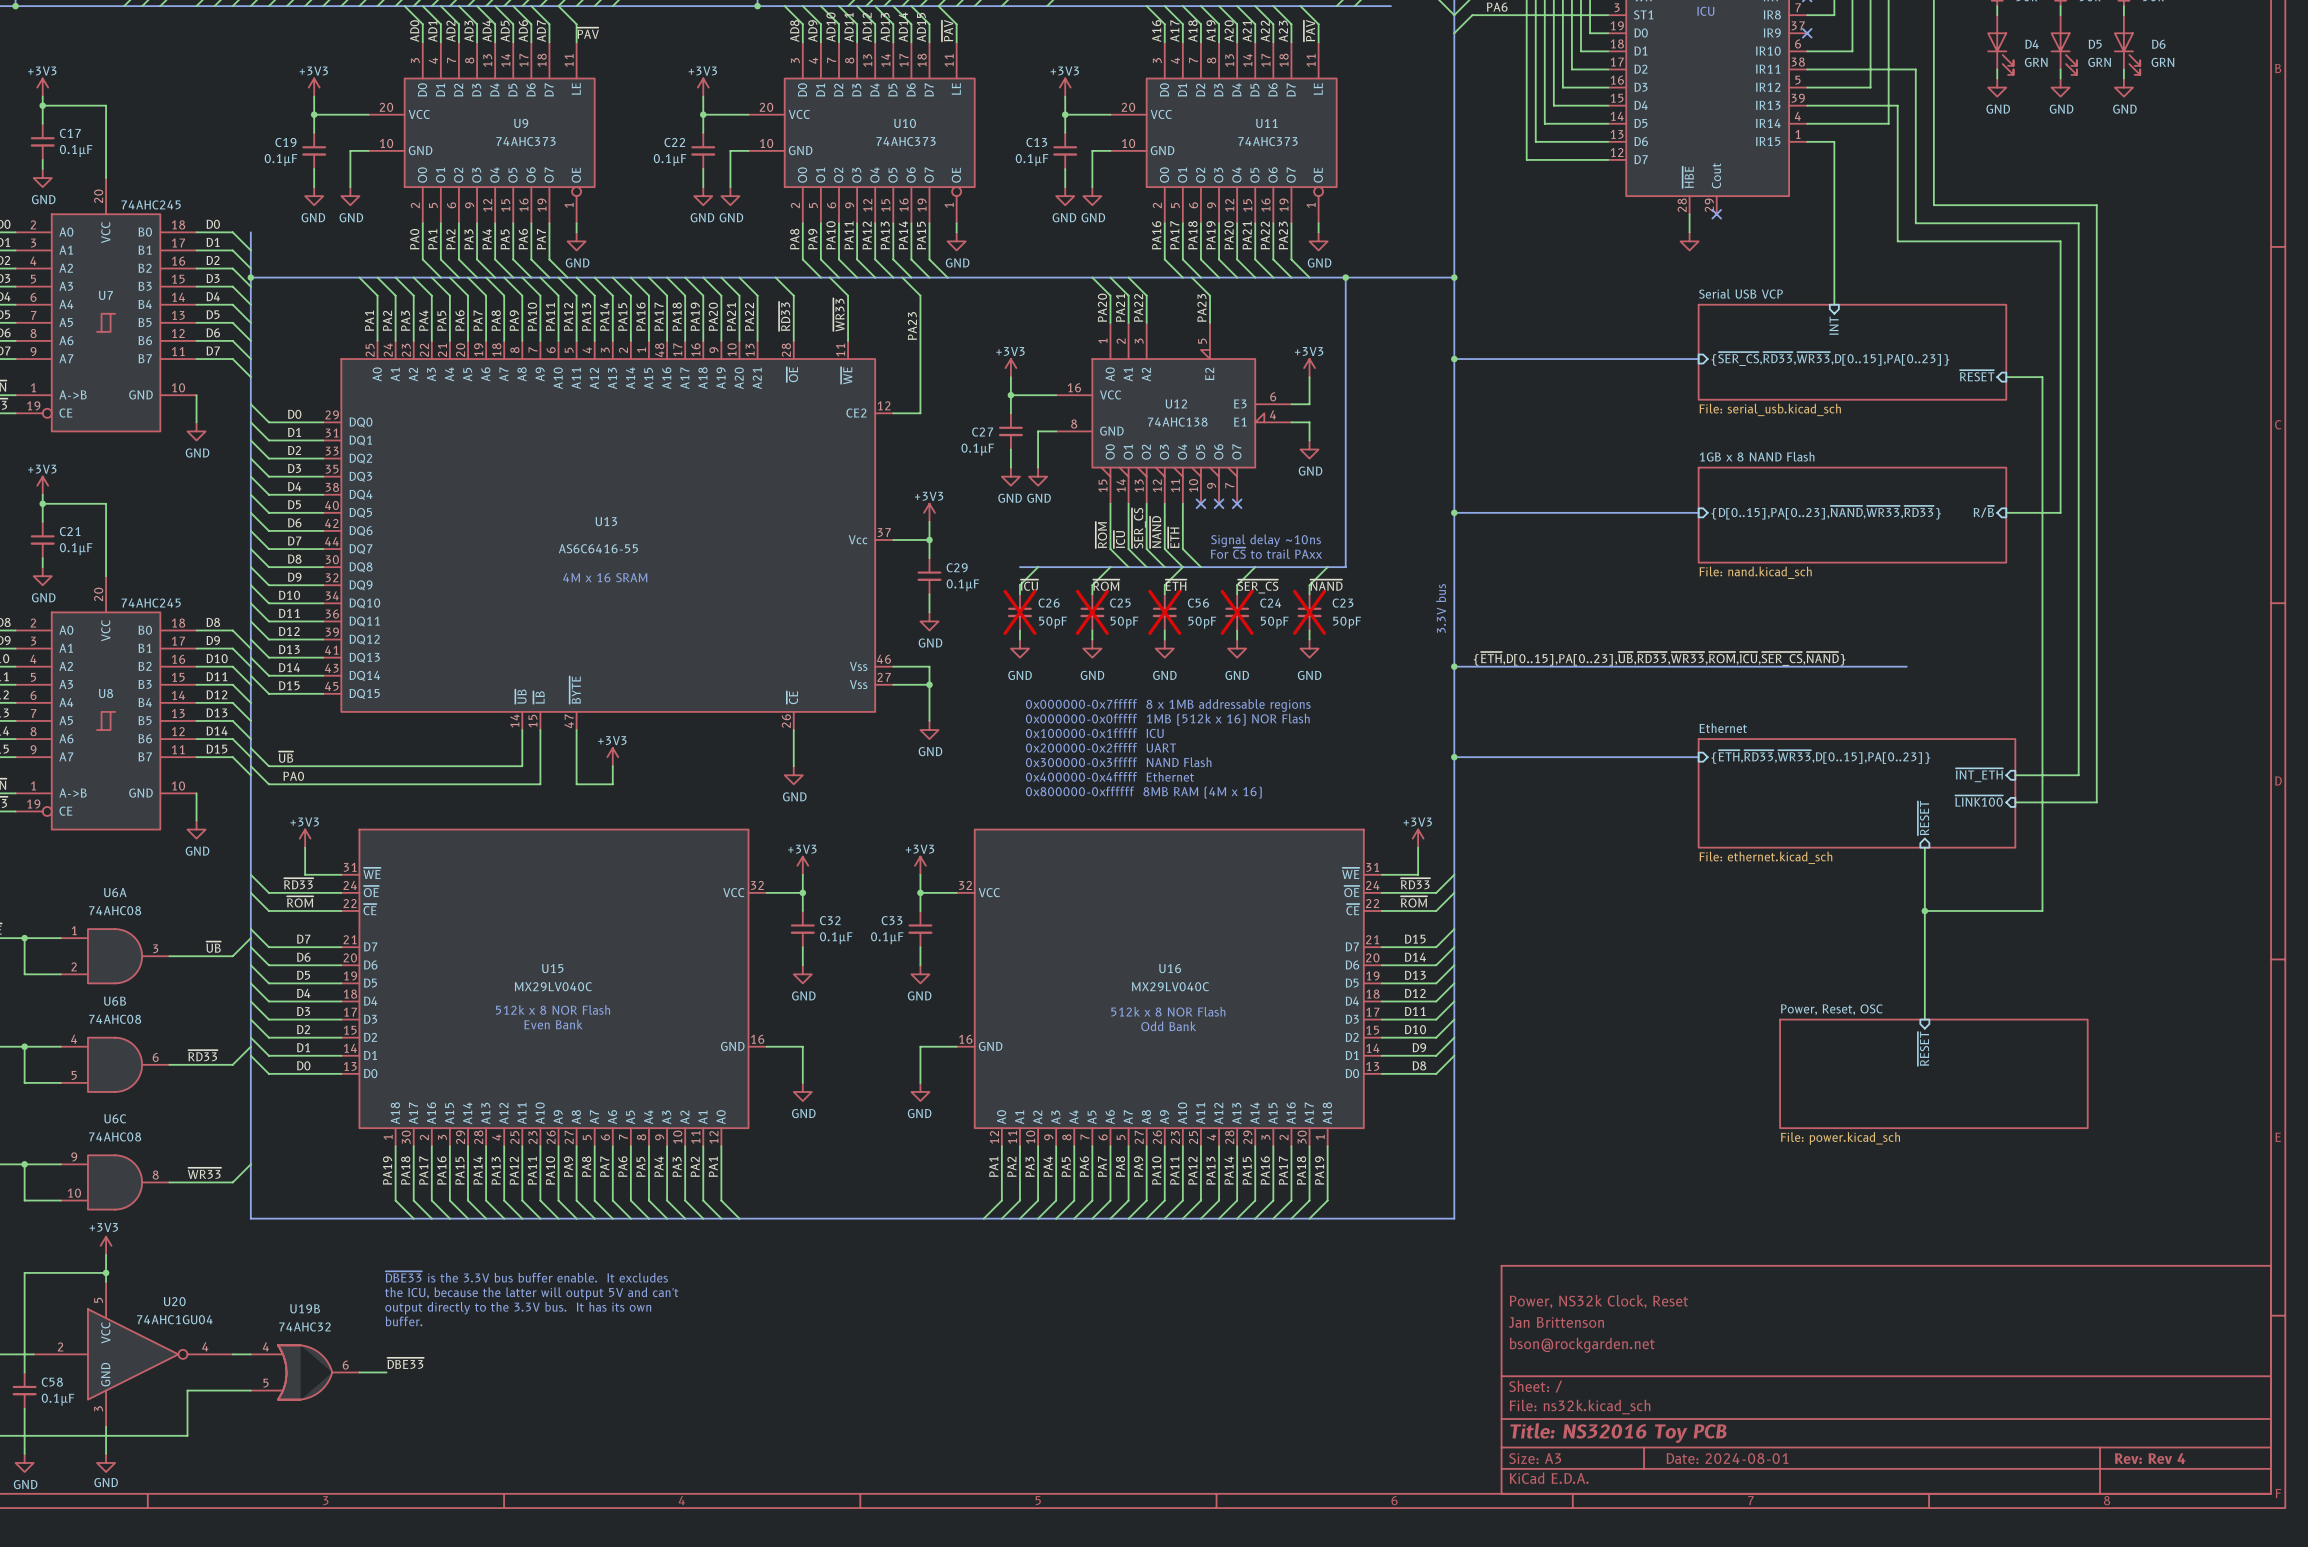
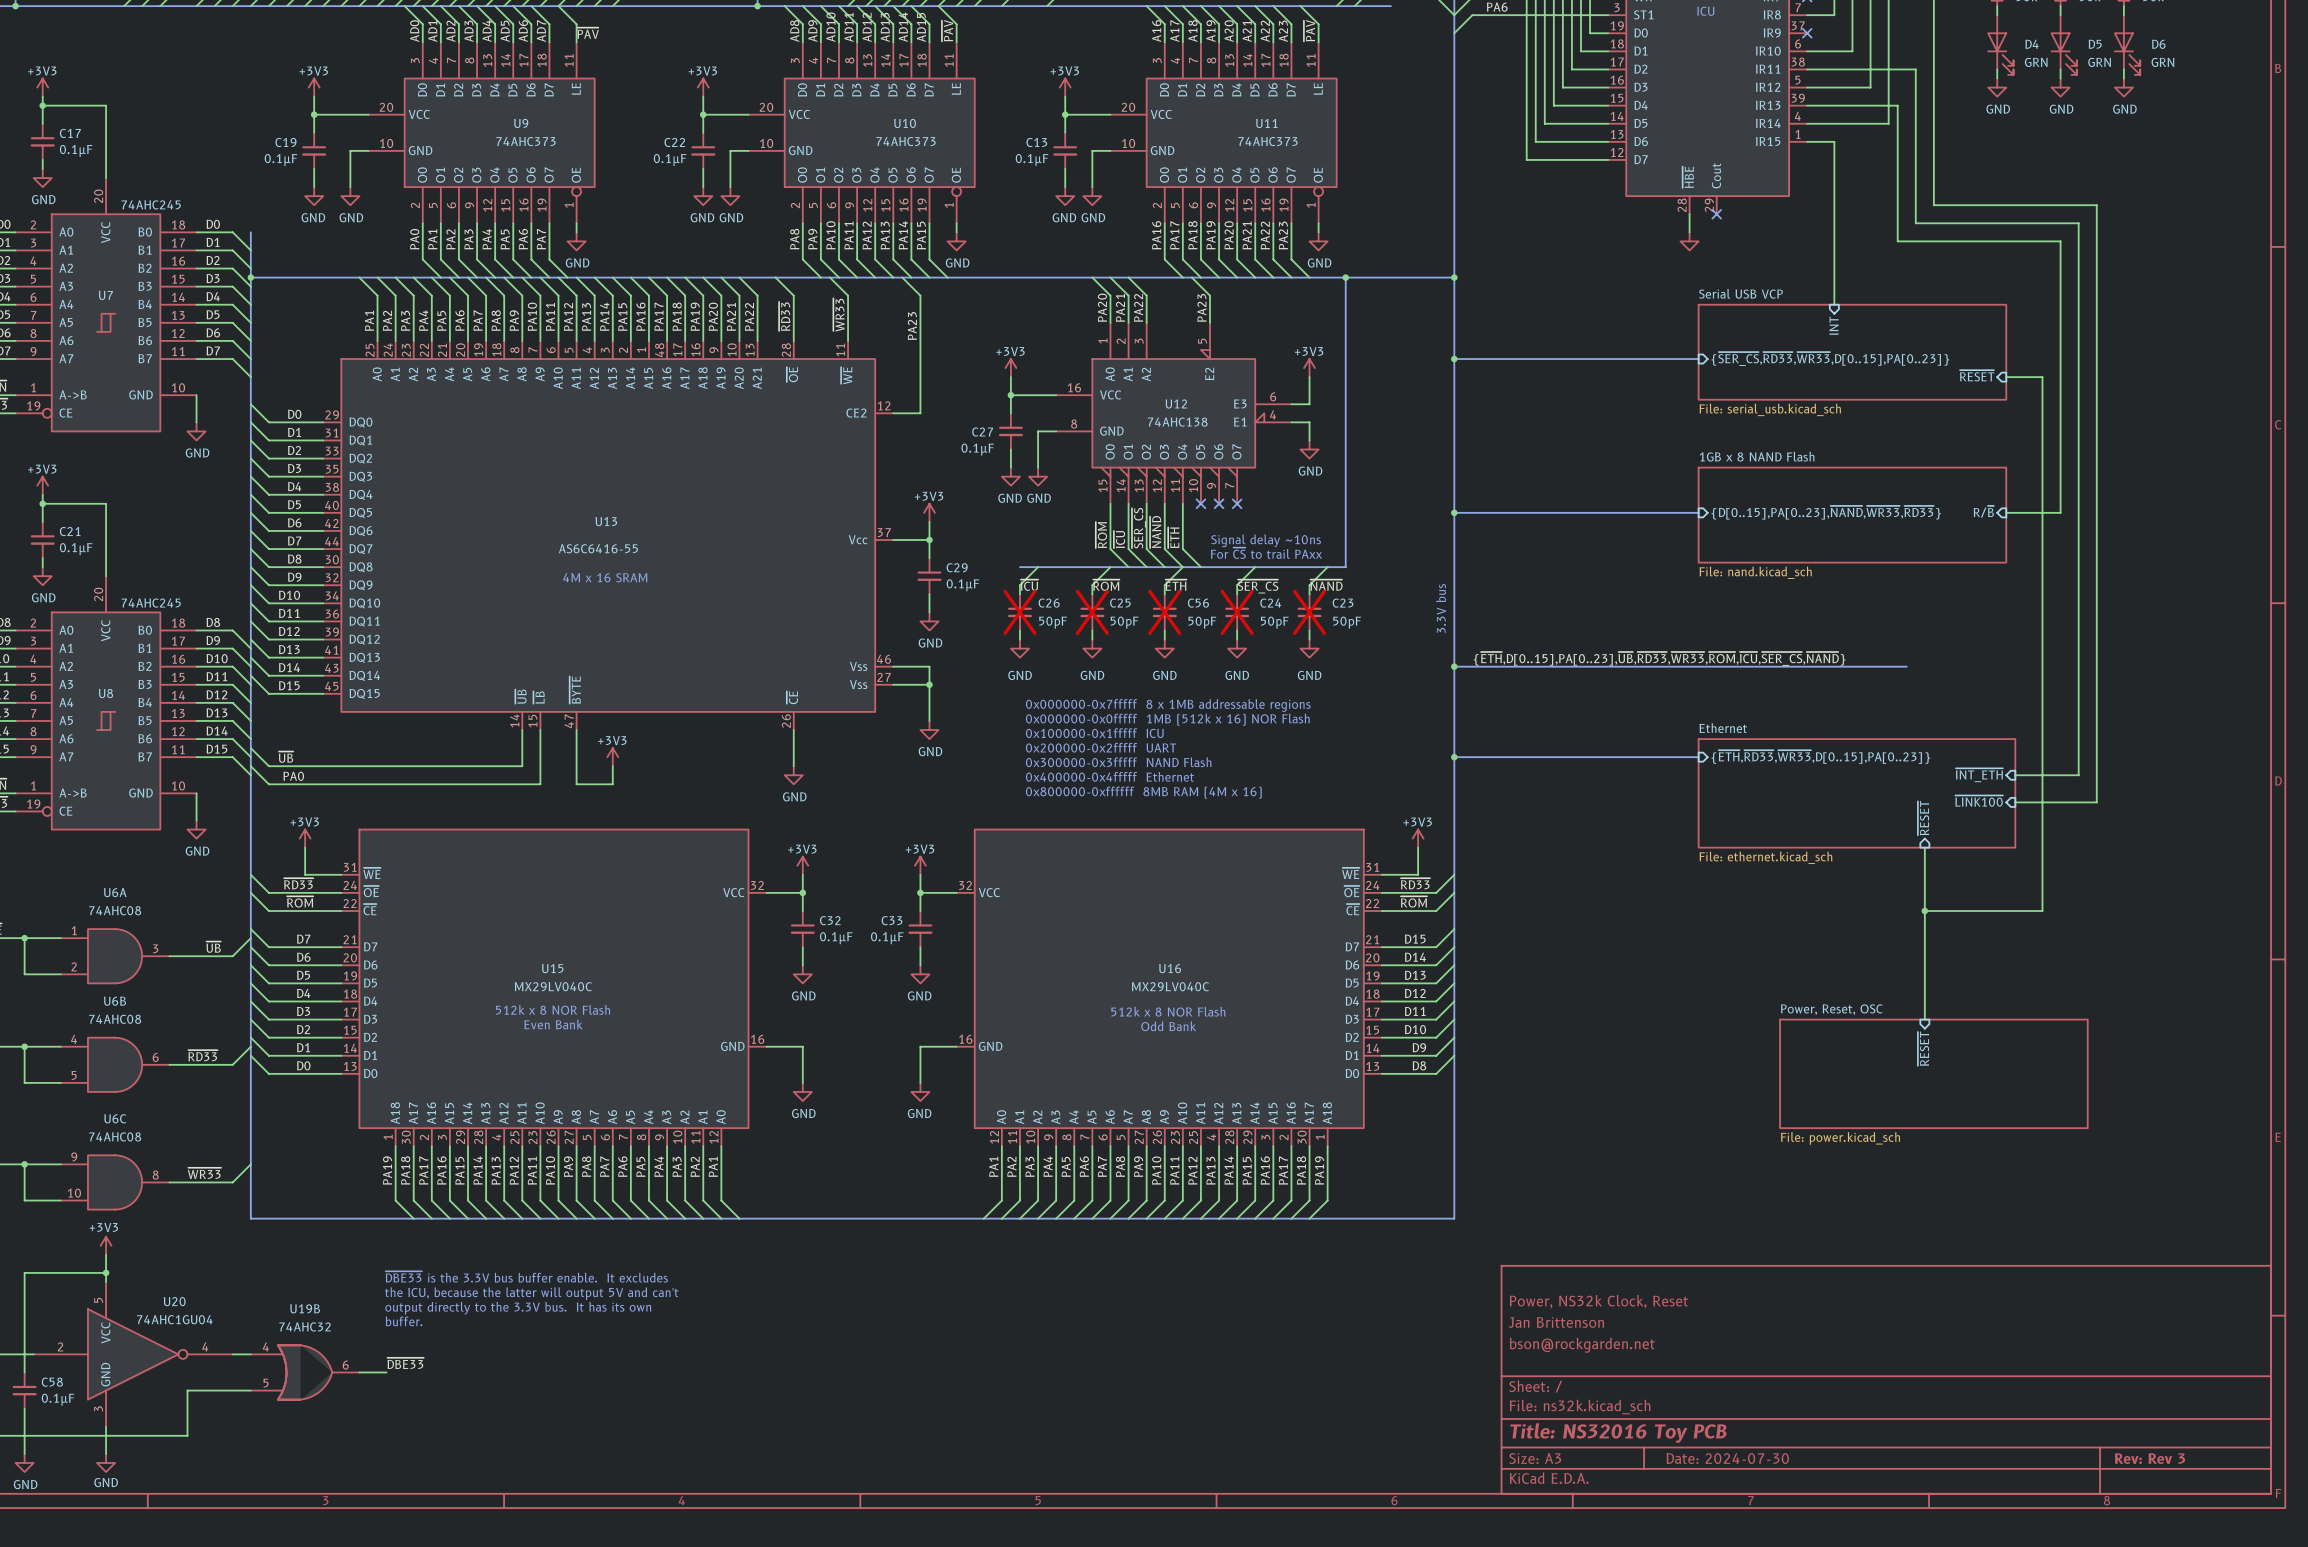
title block: Date: 2024-08-01 (1727, 1458) -> Date: 2024-07-30 (1727, 1458)
title block: Rev: Rev 4 (2150, 1458) -> Rev: Rev 3 (2149, 1458)

